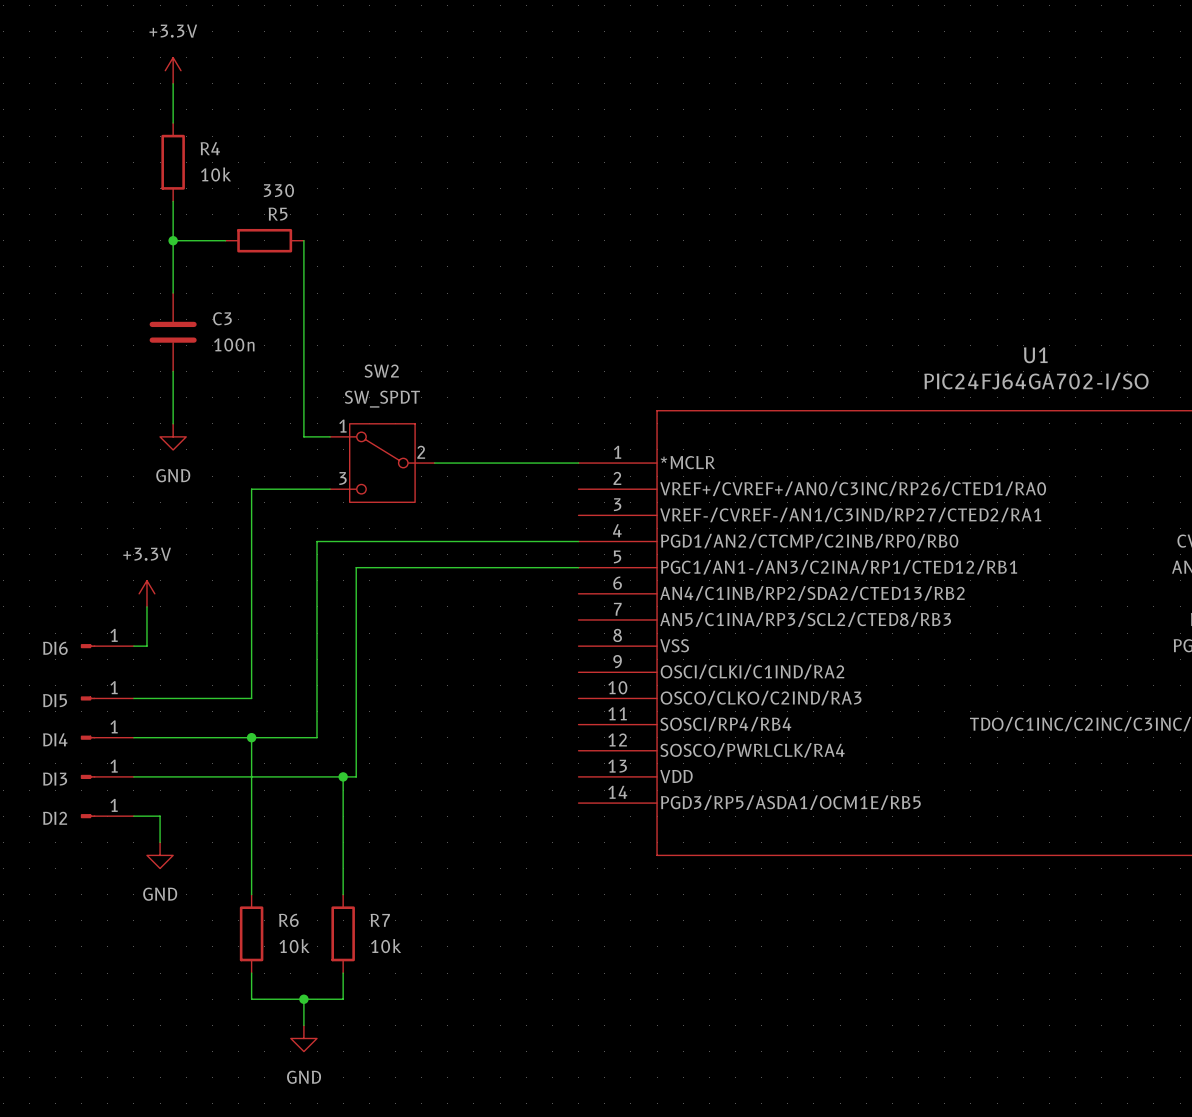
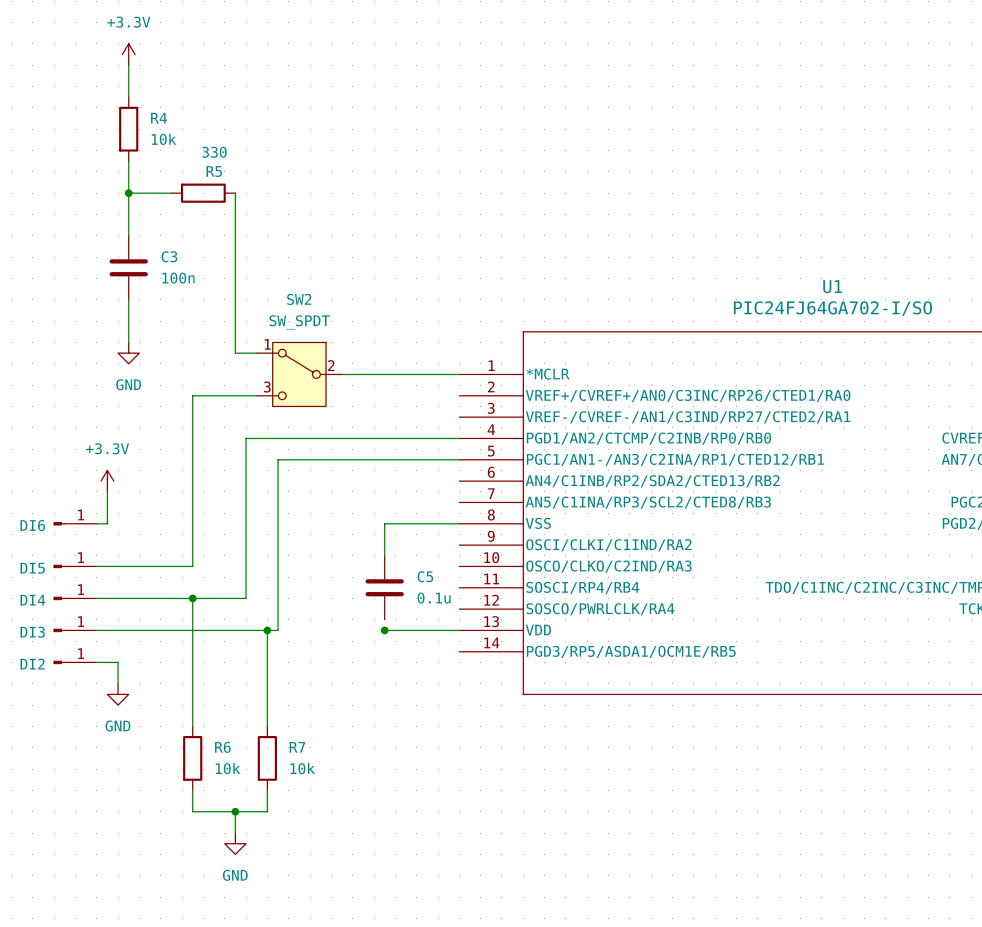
wire: none -> (459, 523) (384, 523) (384, 555)
C5: none -> 0.1u (384, 587)
wire: none -> (384, 630) (459, 630)
junction: none -> (384, 630)

